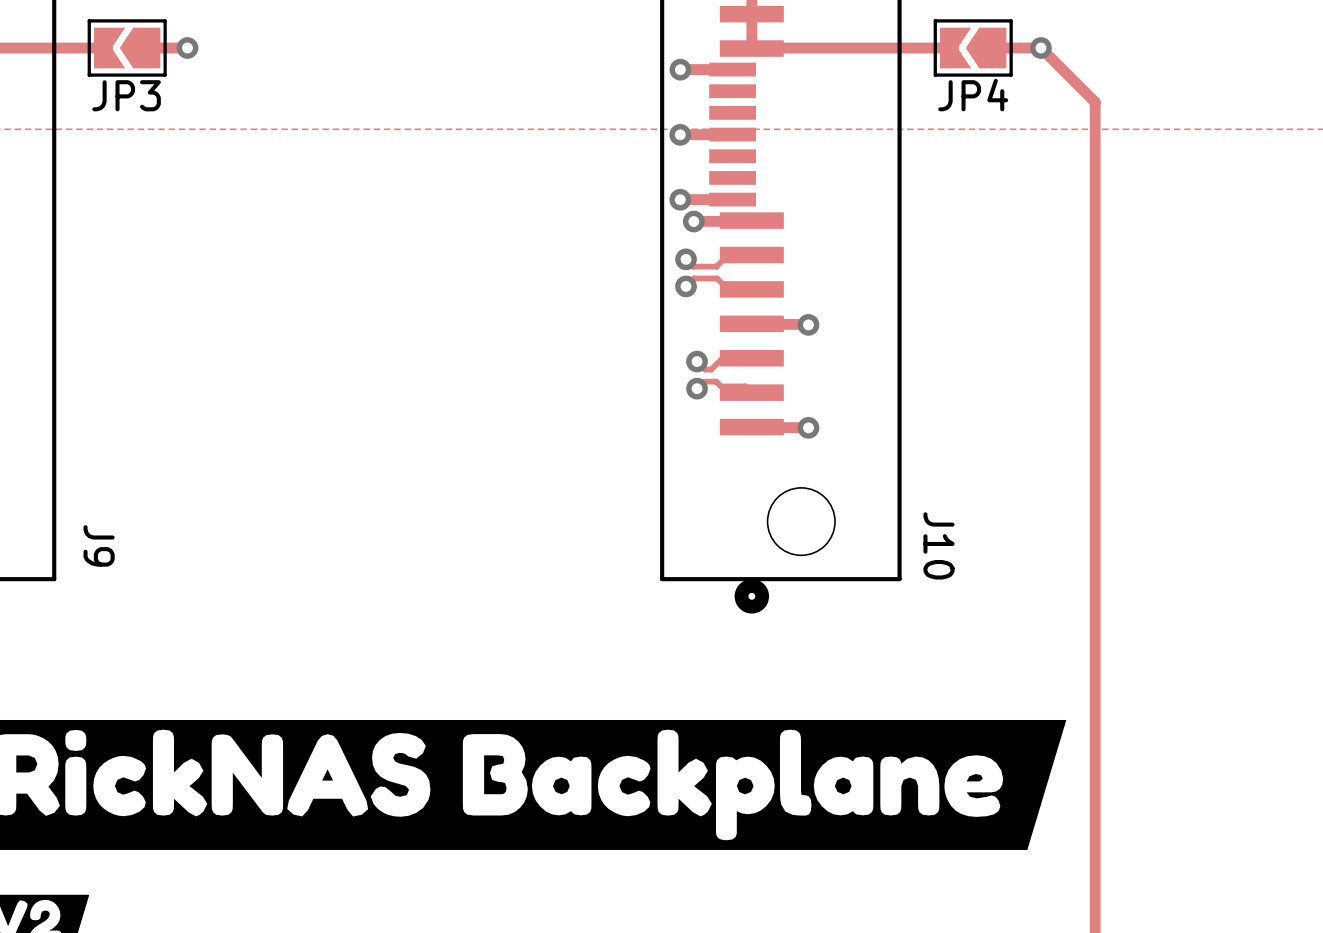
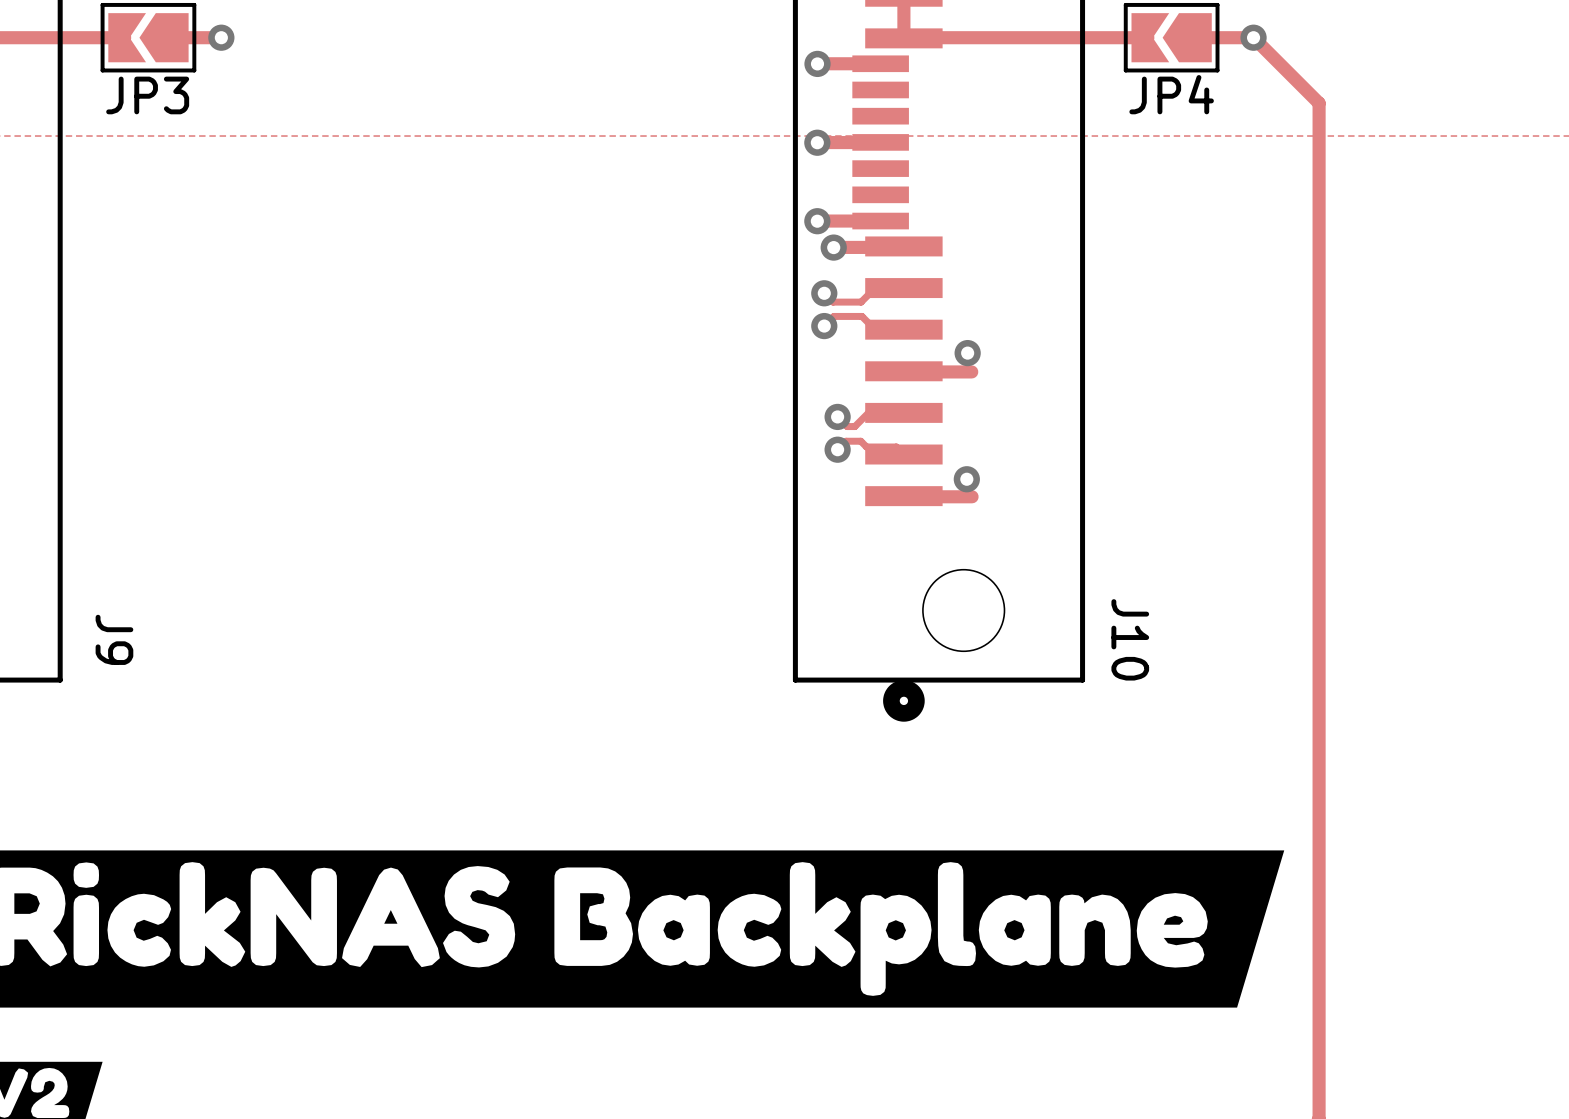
via position: (808, 324) -> (967, 353)
via position: (808, 427) -> (966, 479)

